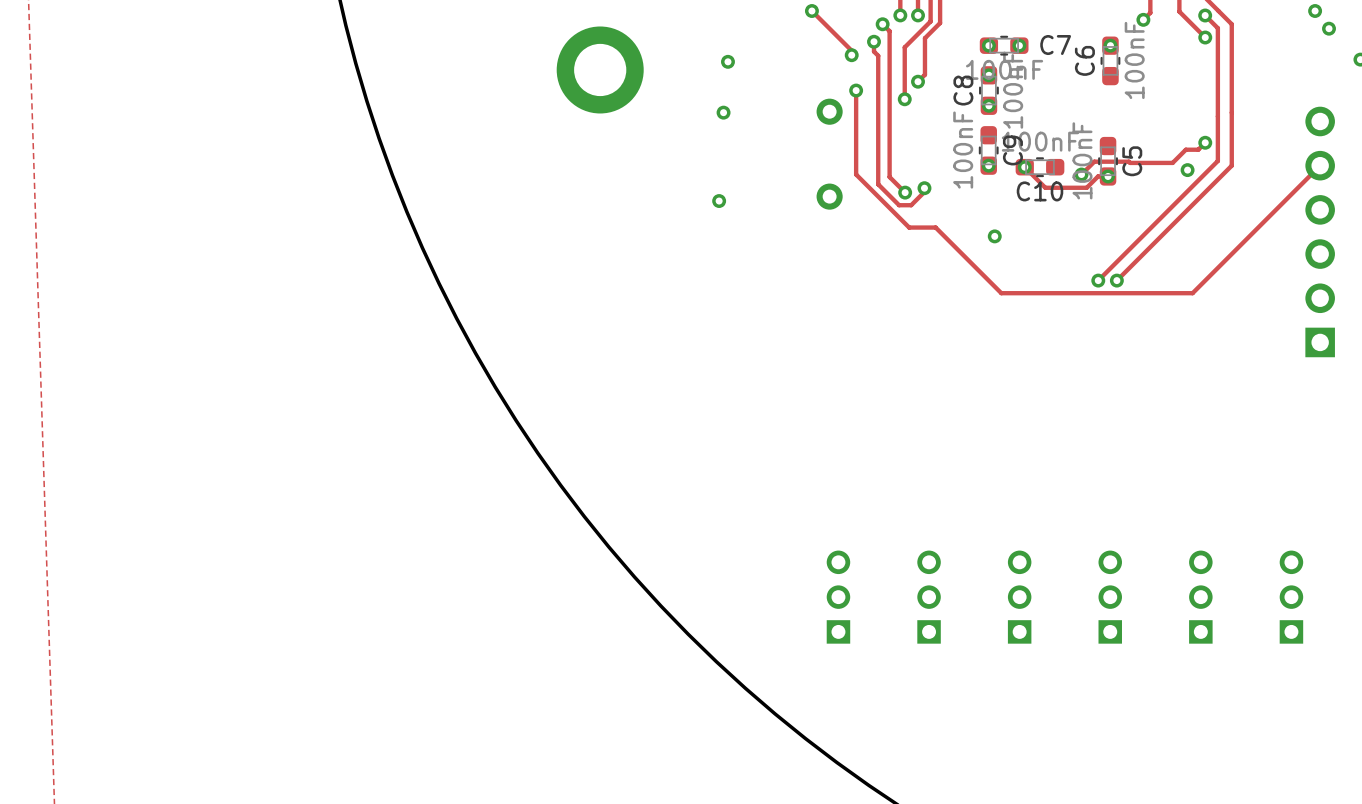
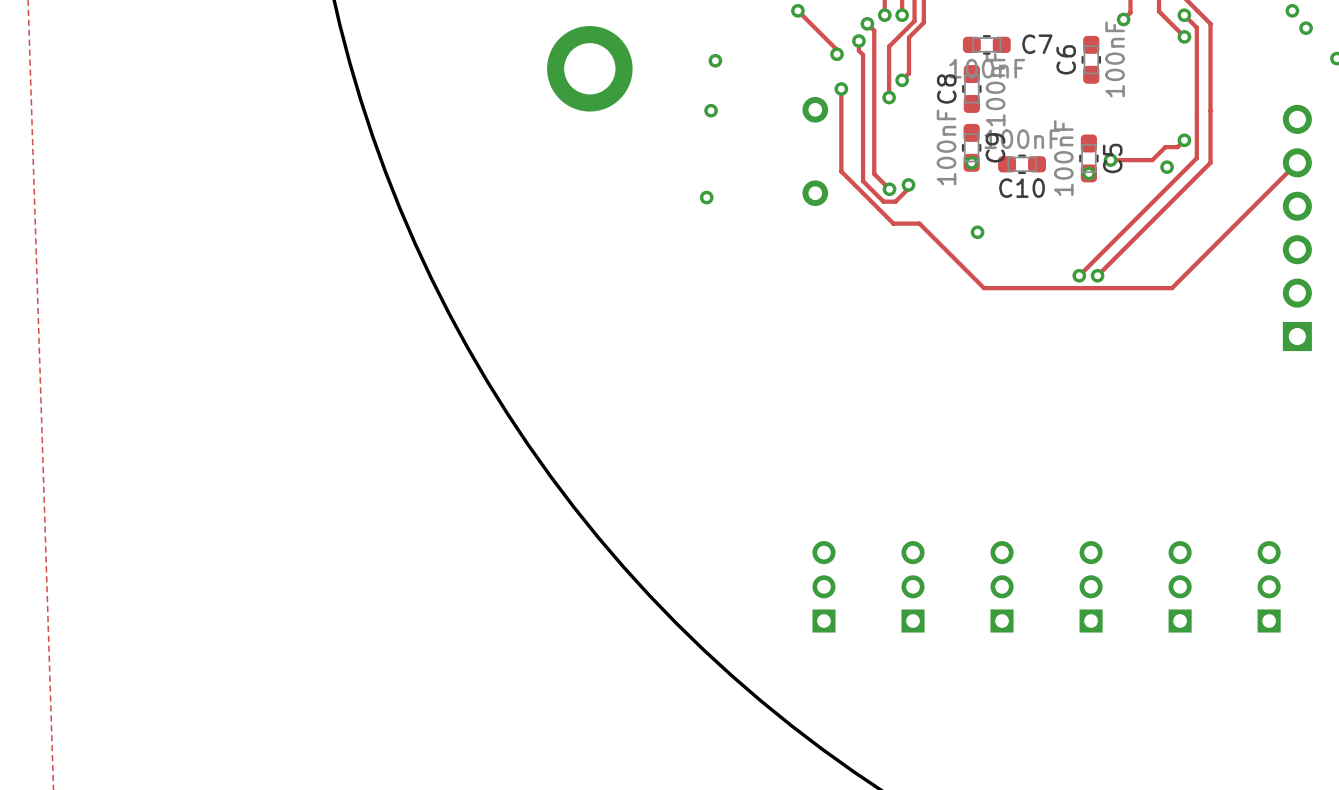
via: (988, 45) -> none
via: (1019, 45) -> none
via: (1110, 45) -> none
via: (988, 75) -> none
via: (988, 105) -> none
track: (1130, 162) (1094, 161) (1081, 174) -> none
track: (1024, 167) (1045, 187) (1086, 187) (1098, 176) (1108, 176) -> none
via: (1024, 167) -> none
via position: (1081, 174) -> (1110, 160)

